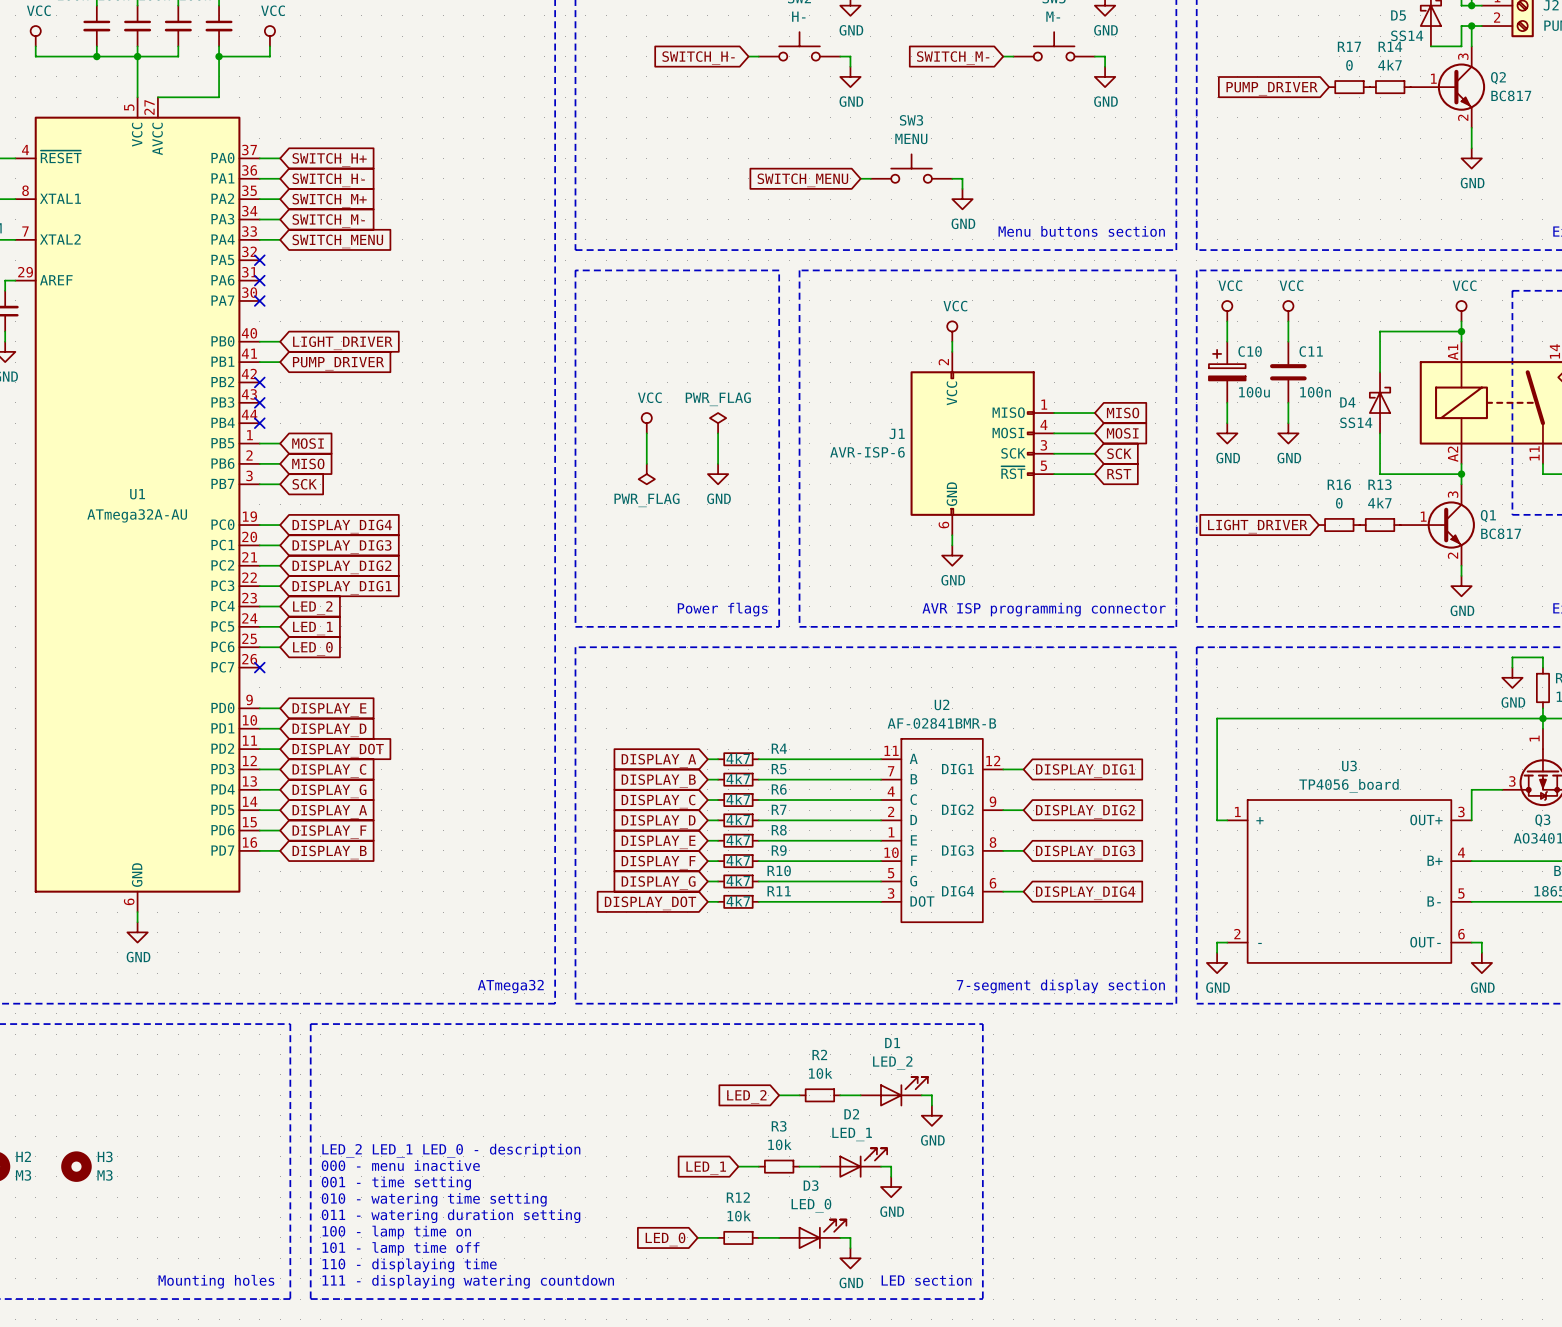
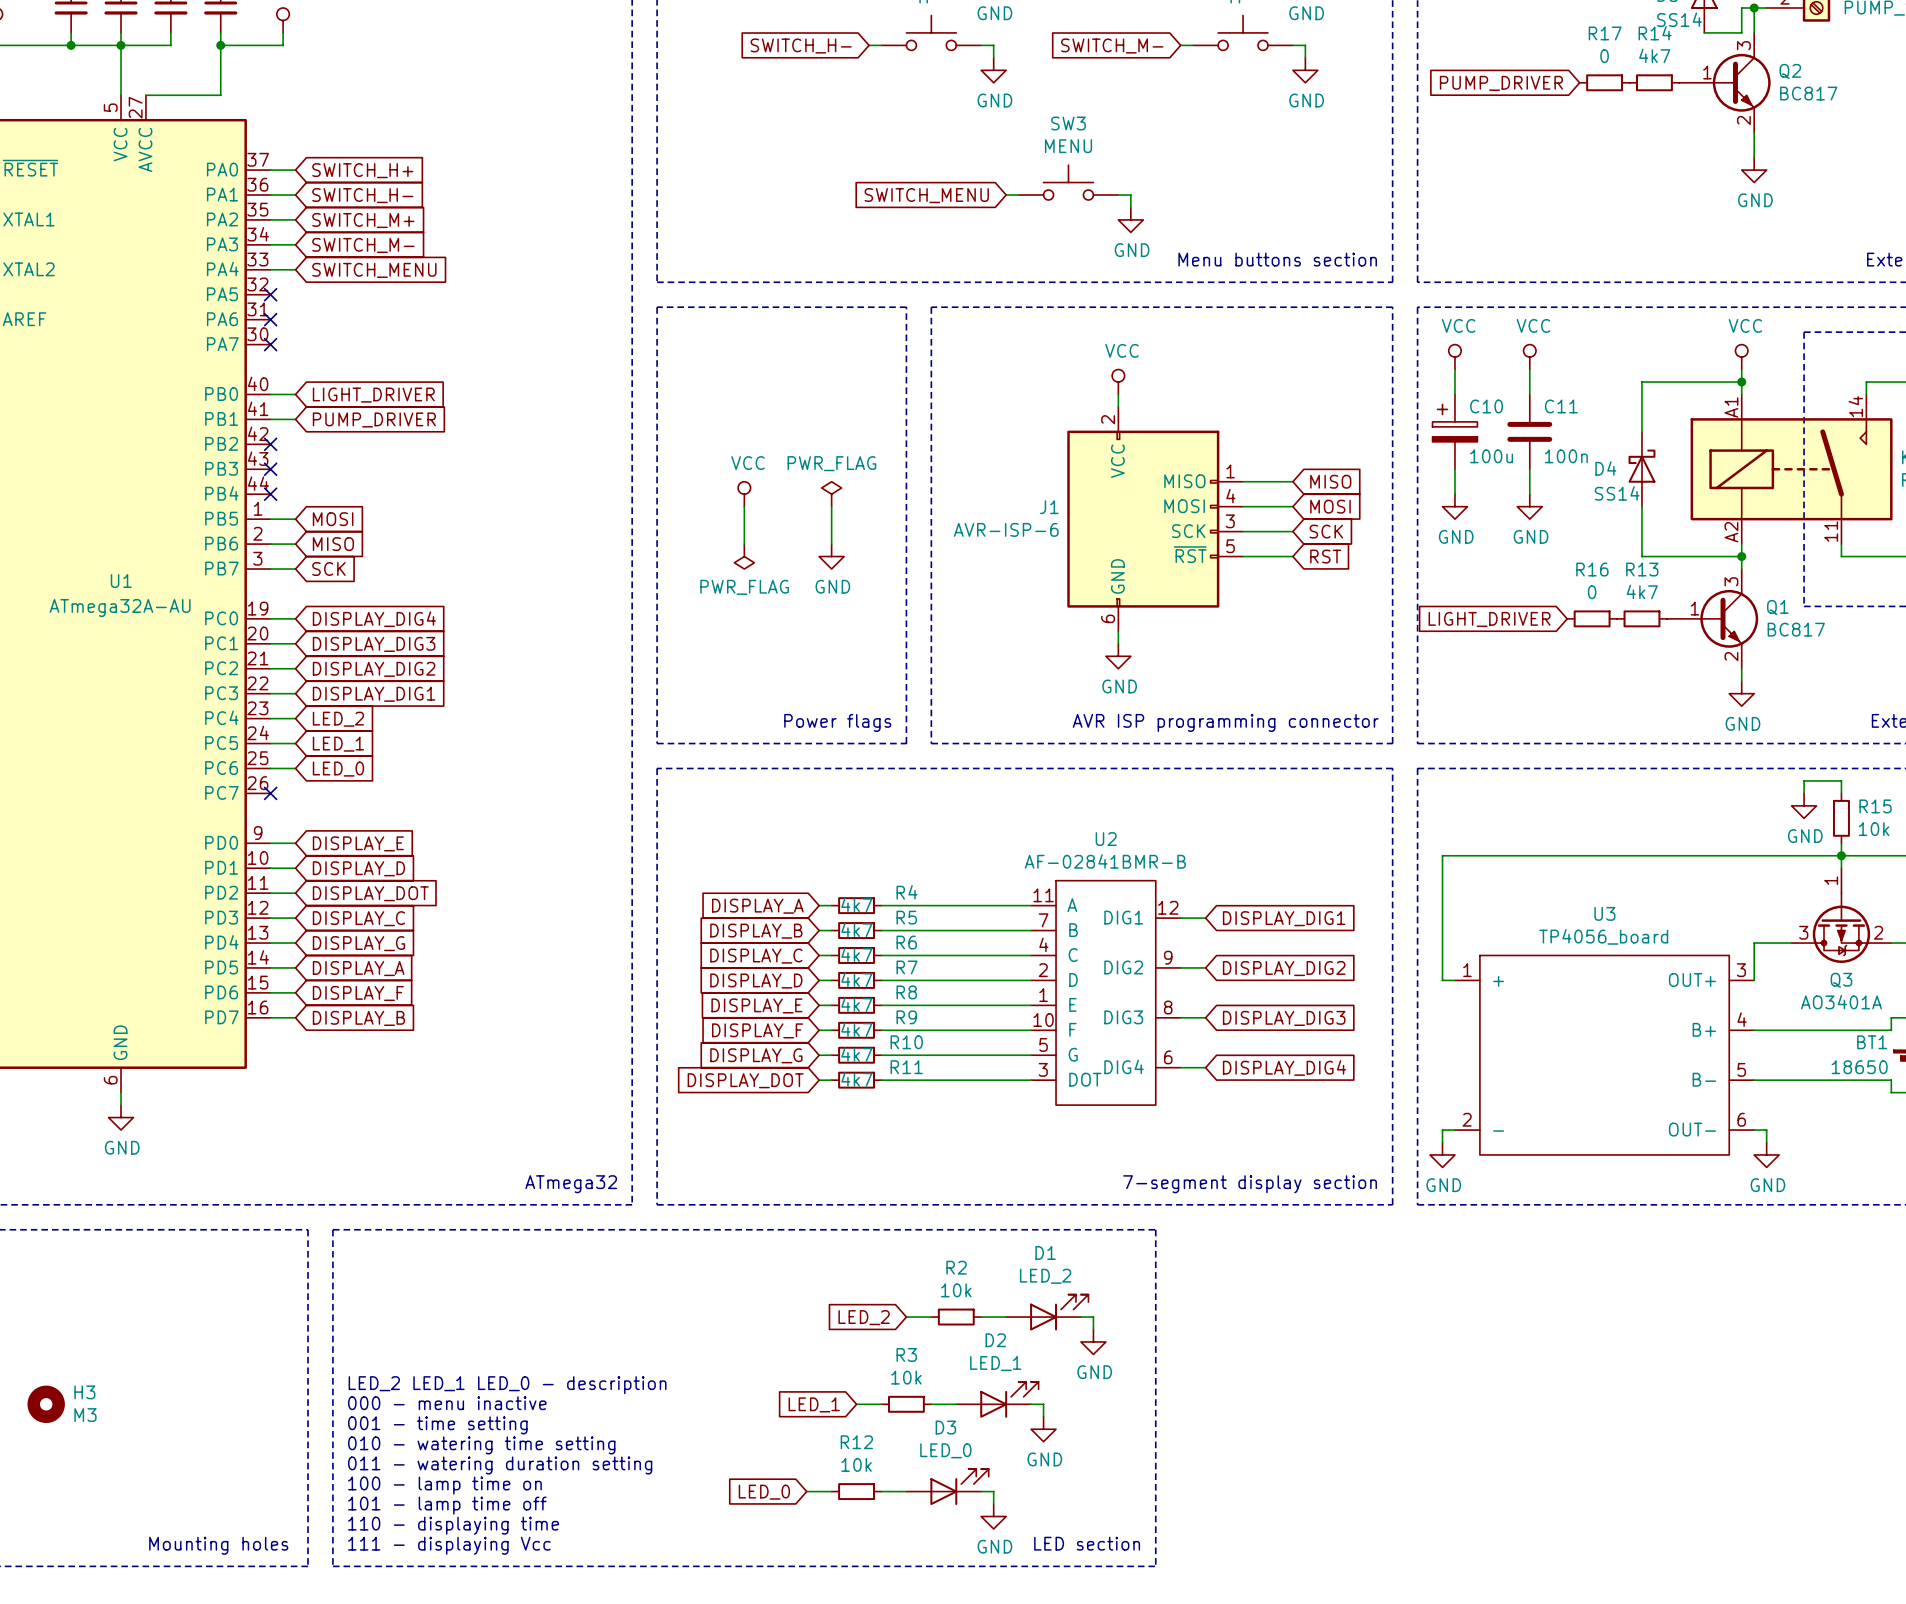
text: 111 - displaying watering countdown (468, 1281) -> 111 - displaying Vcc (449, 1545)

